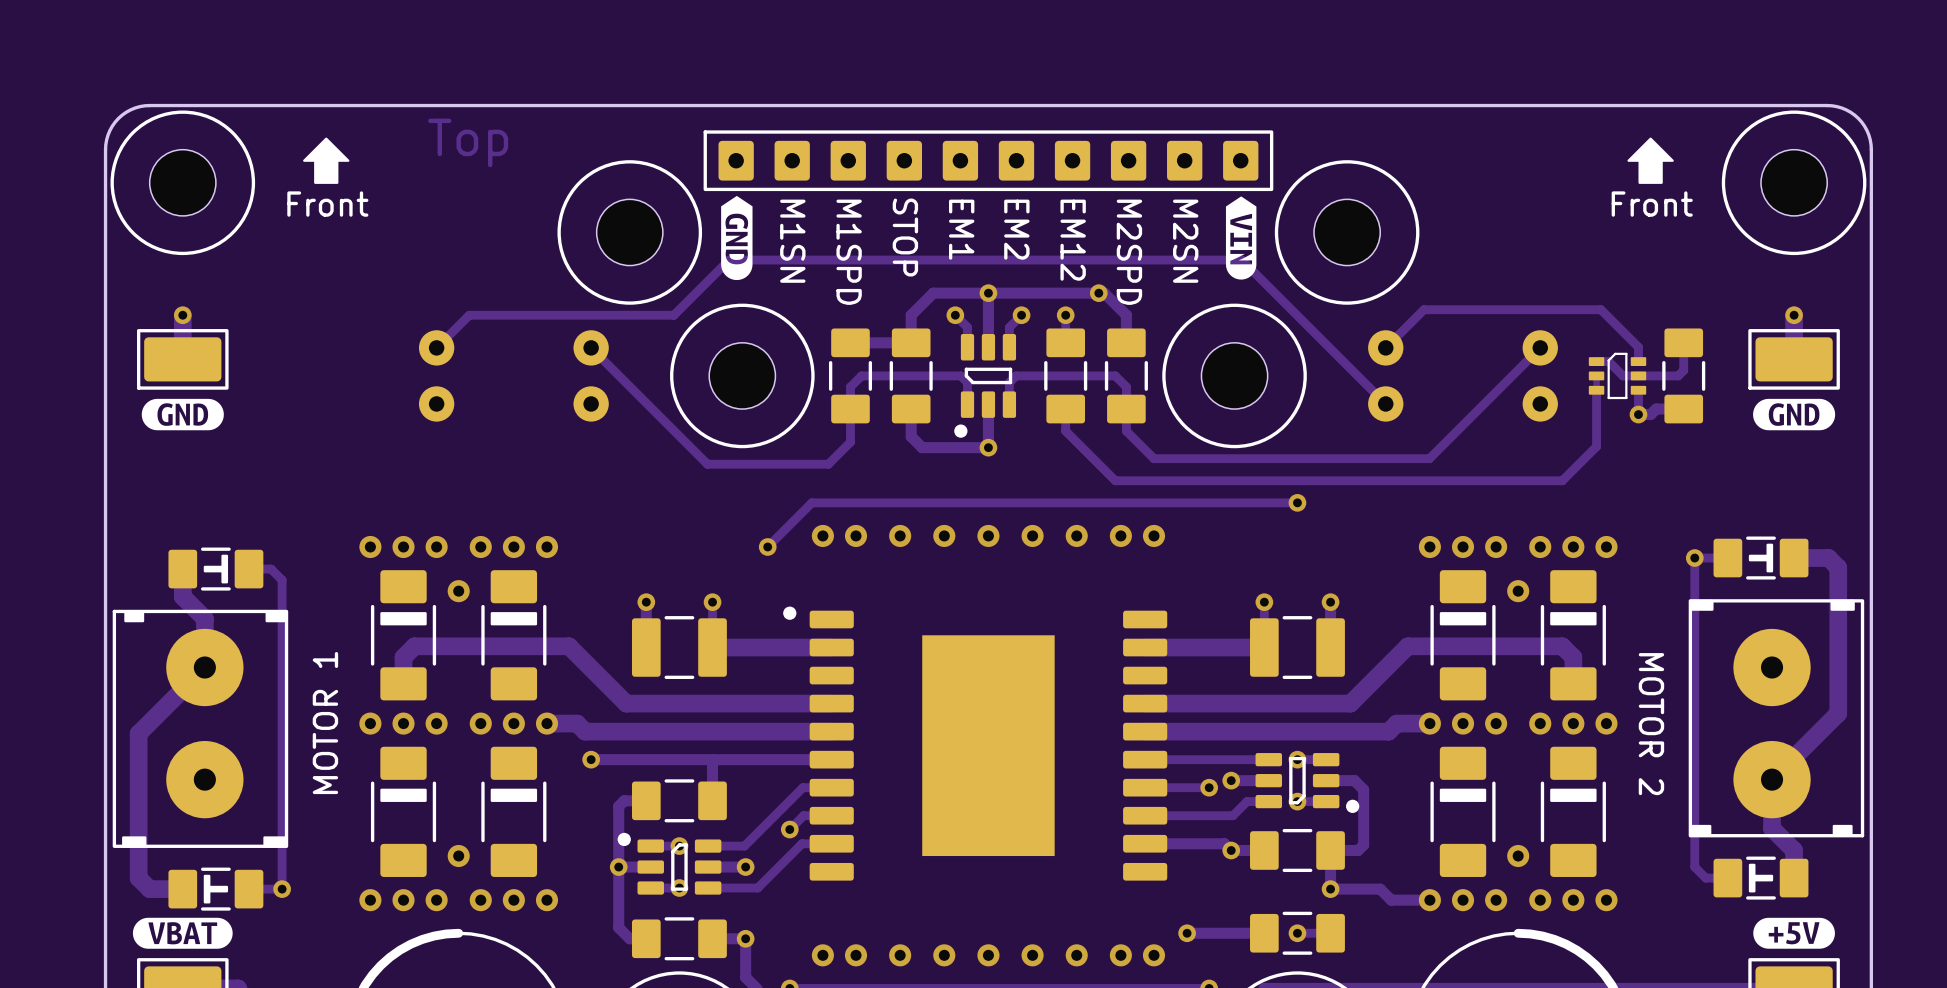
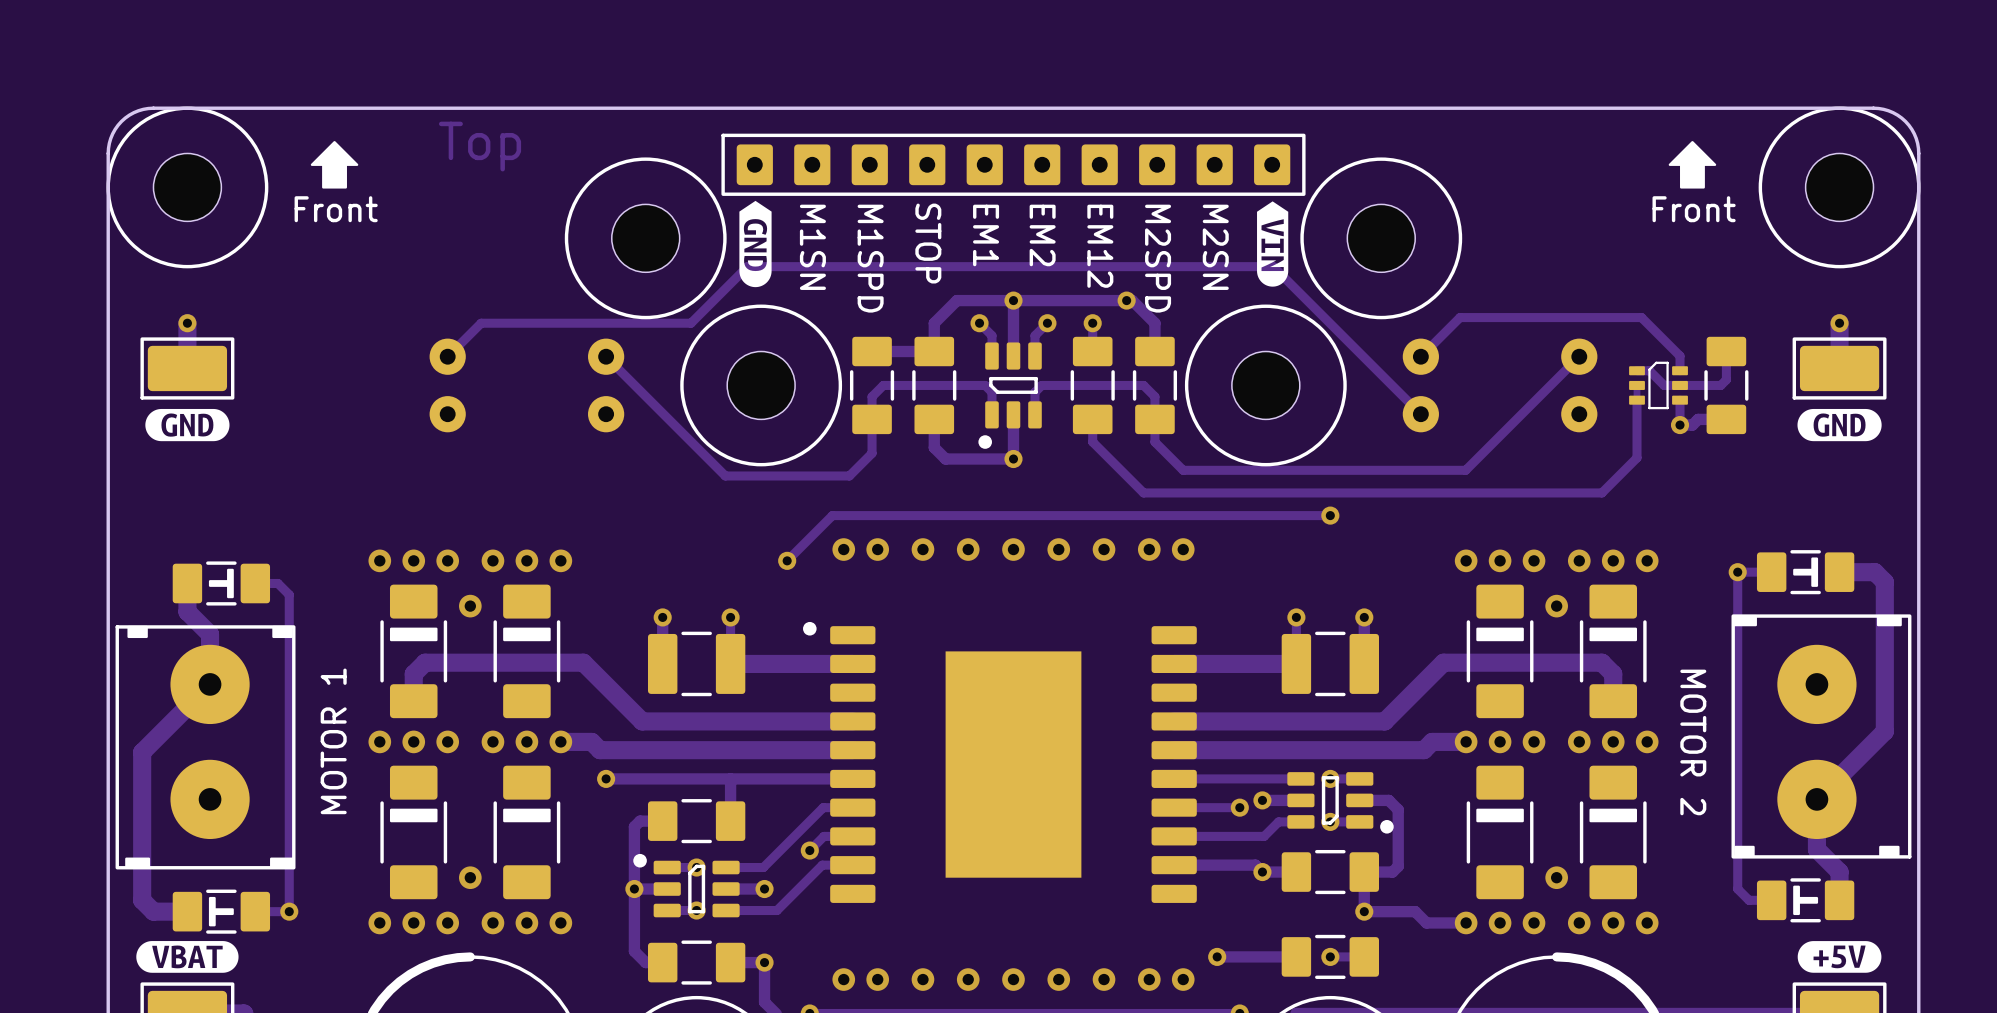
part footprint: [110, 110, 256, 256] -> [106, 106, 269, 269]
part footprint: [1721, 110, 1867, 256] -> [1758, 106, 1921, 269]
part footprint: [557, 160, 703, 305] -> [564, 157, 727, 320]
part footprint: [1274, 160, 1420, 305] -> [1300, 157, 1463, 320]
part footprint: [670, 303, 815, 449] -> [680, 304, 843, 467]
part footprint: [1162, 303, 1307, 449] -> [1184, 304, 1347, 467]

